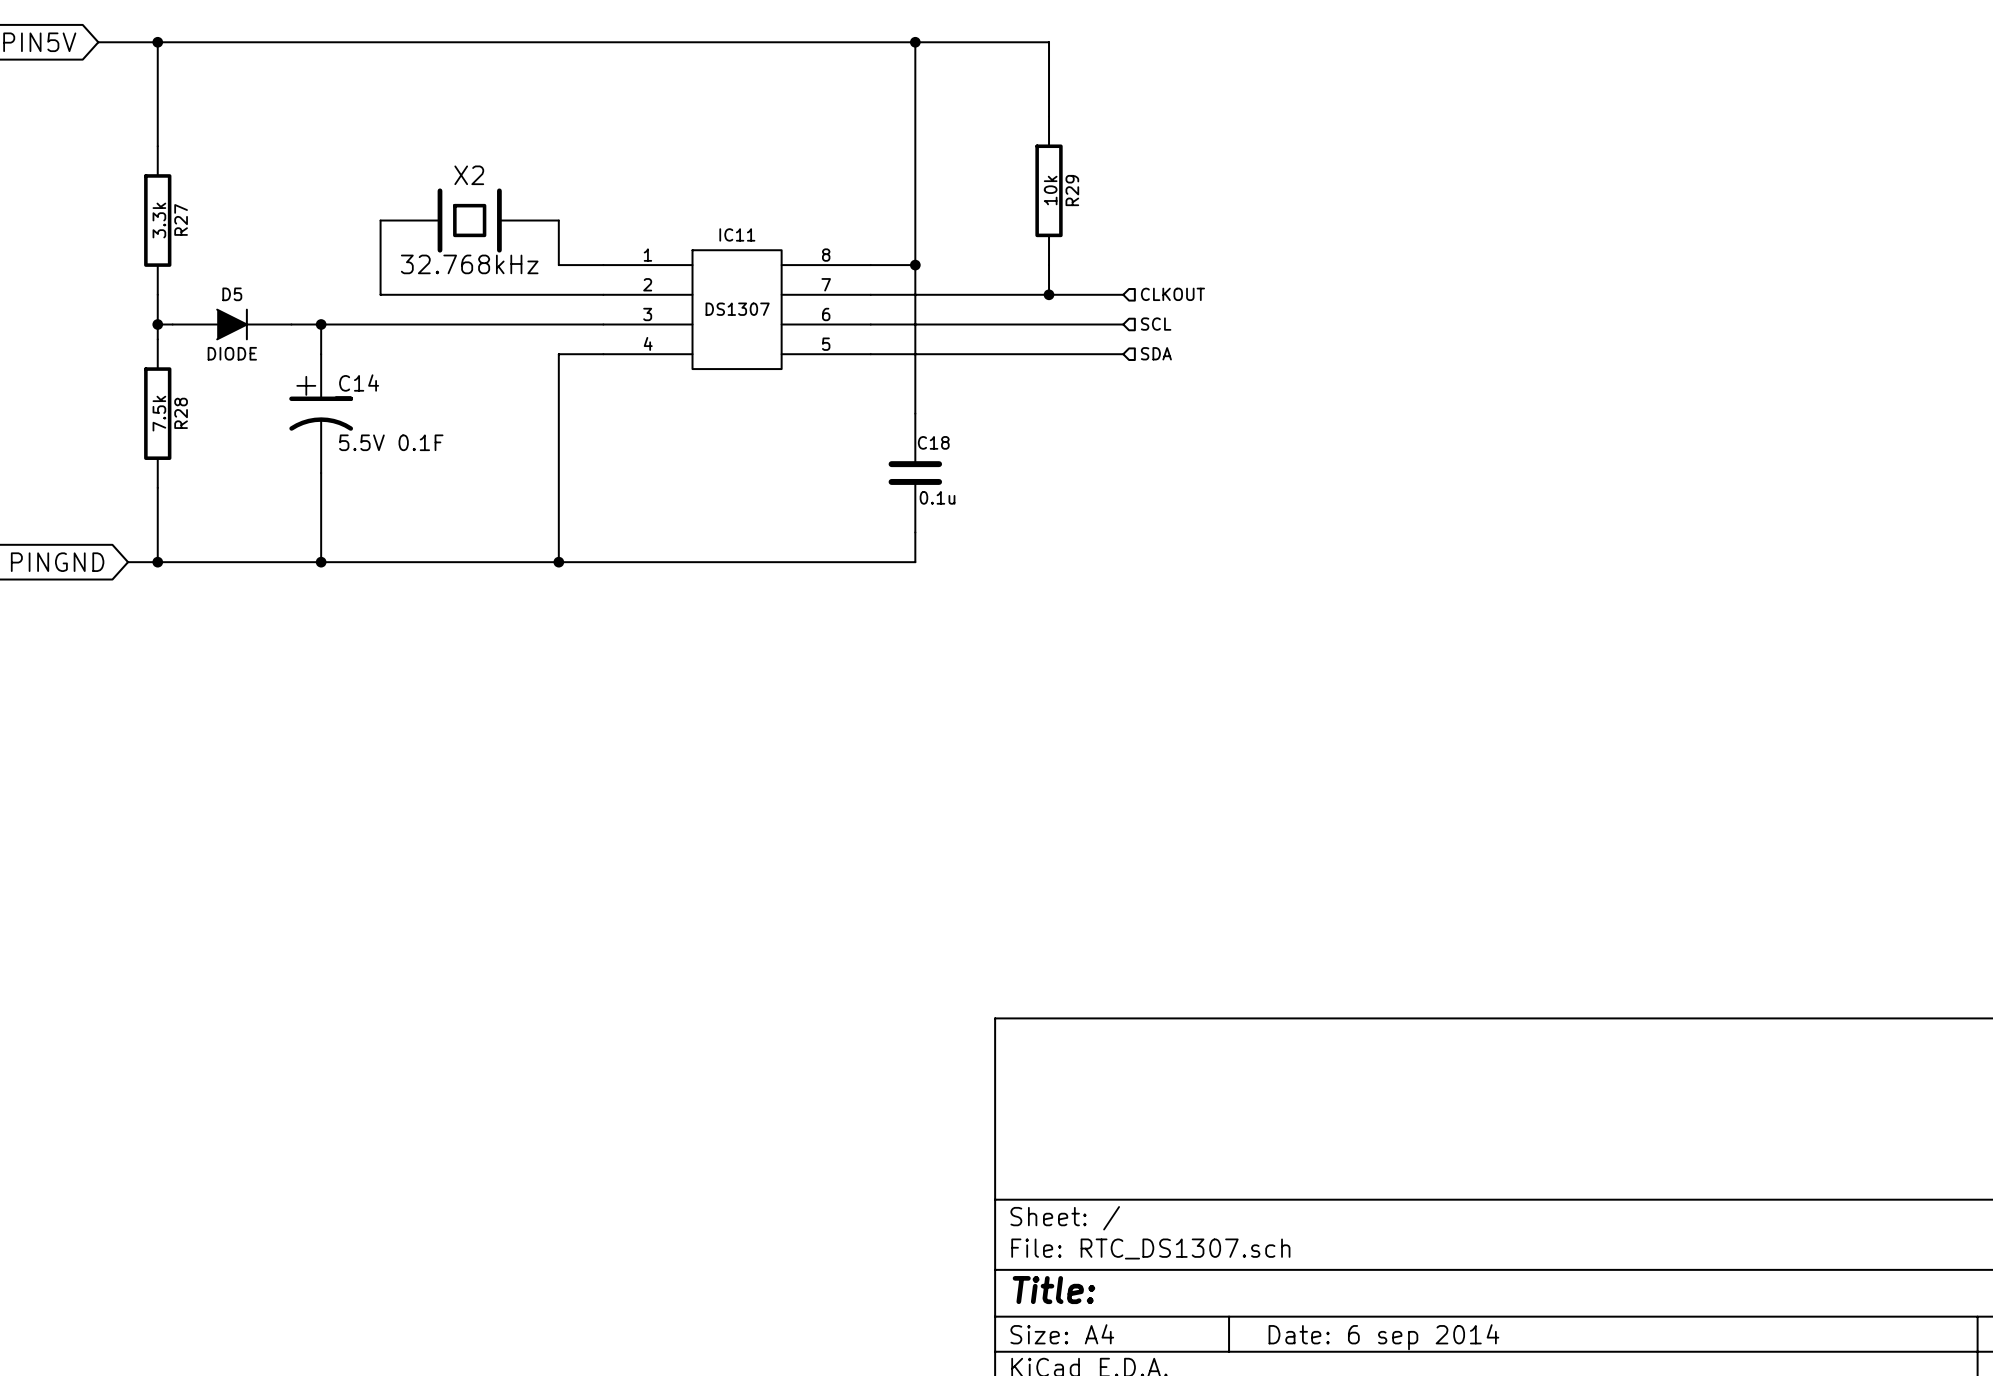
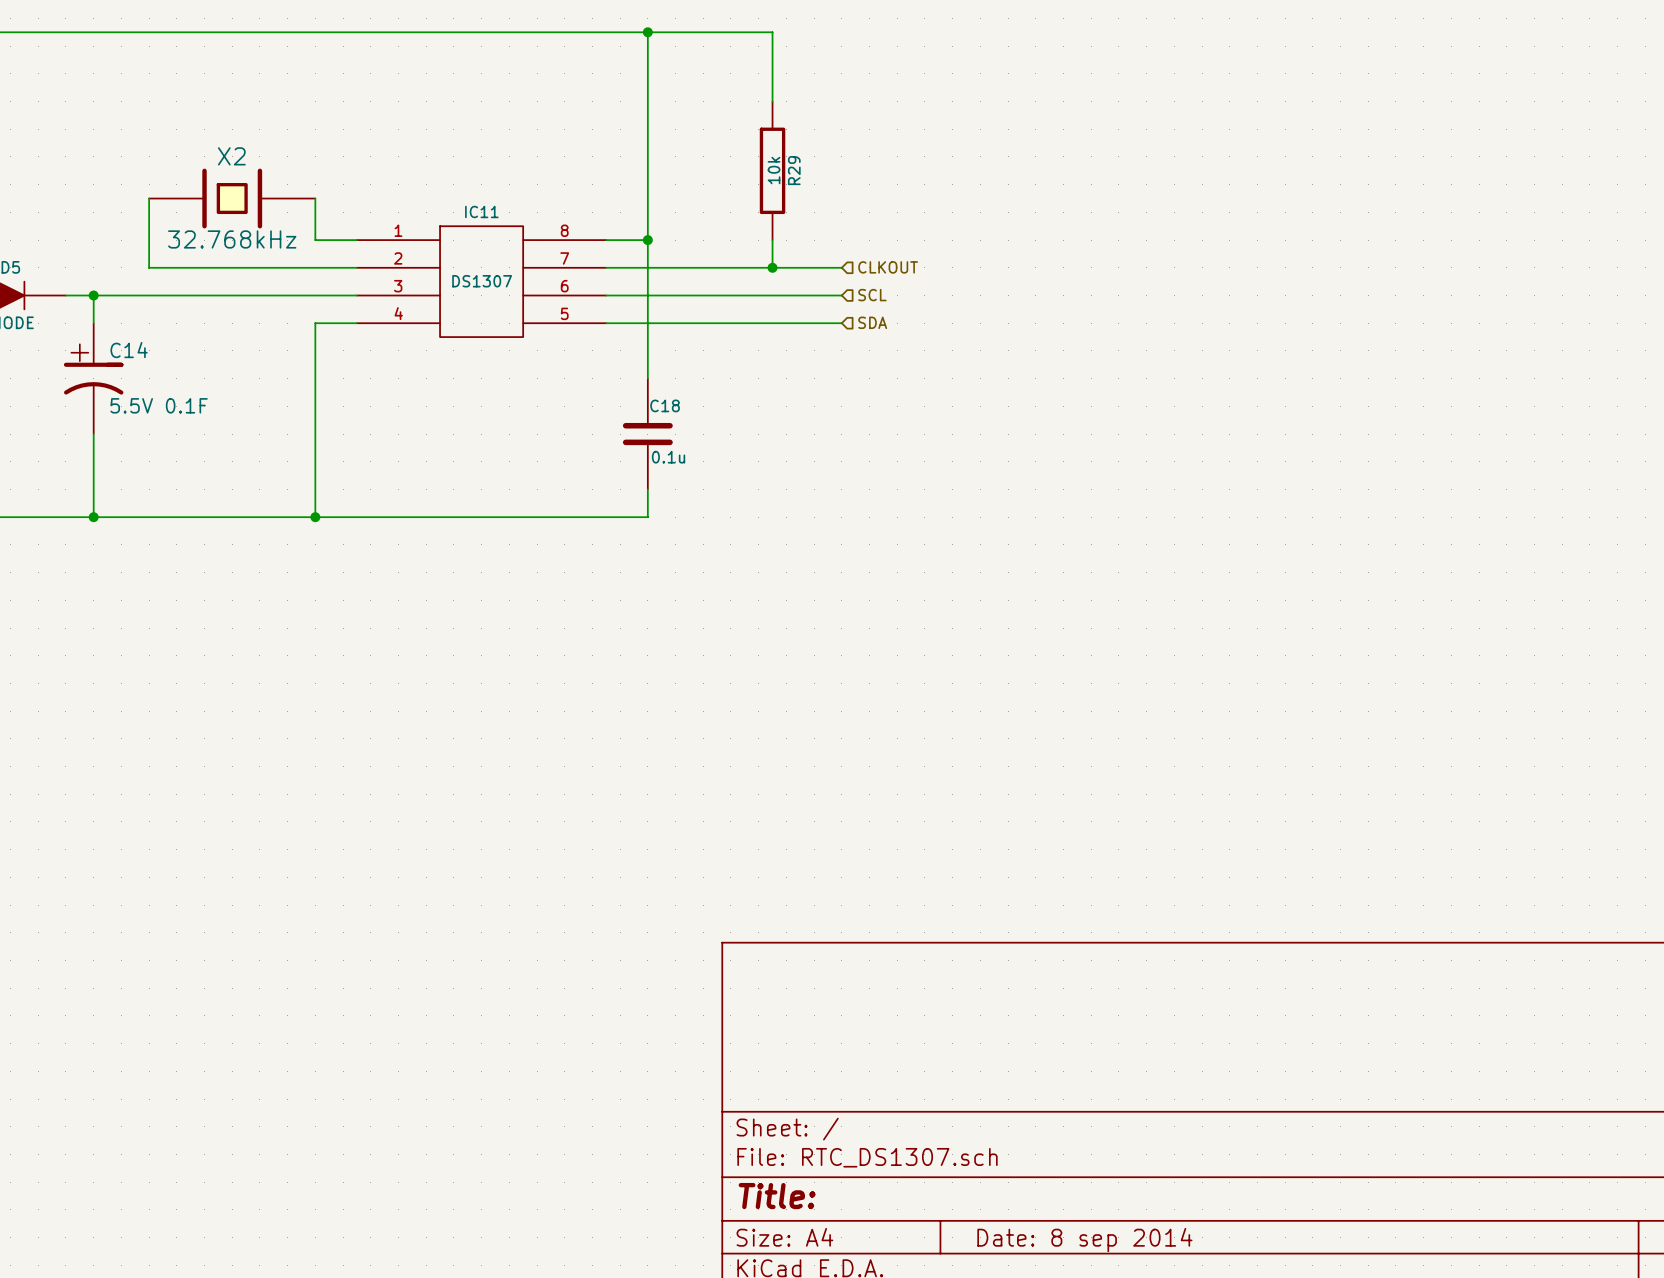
title block: Date: 6 sep 2014 (1383, 1337) -> Date: 8 sep 2014 (1084, 1240)

